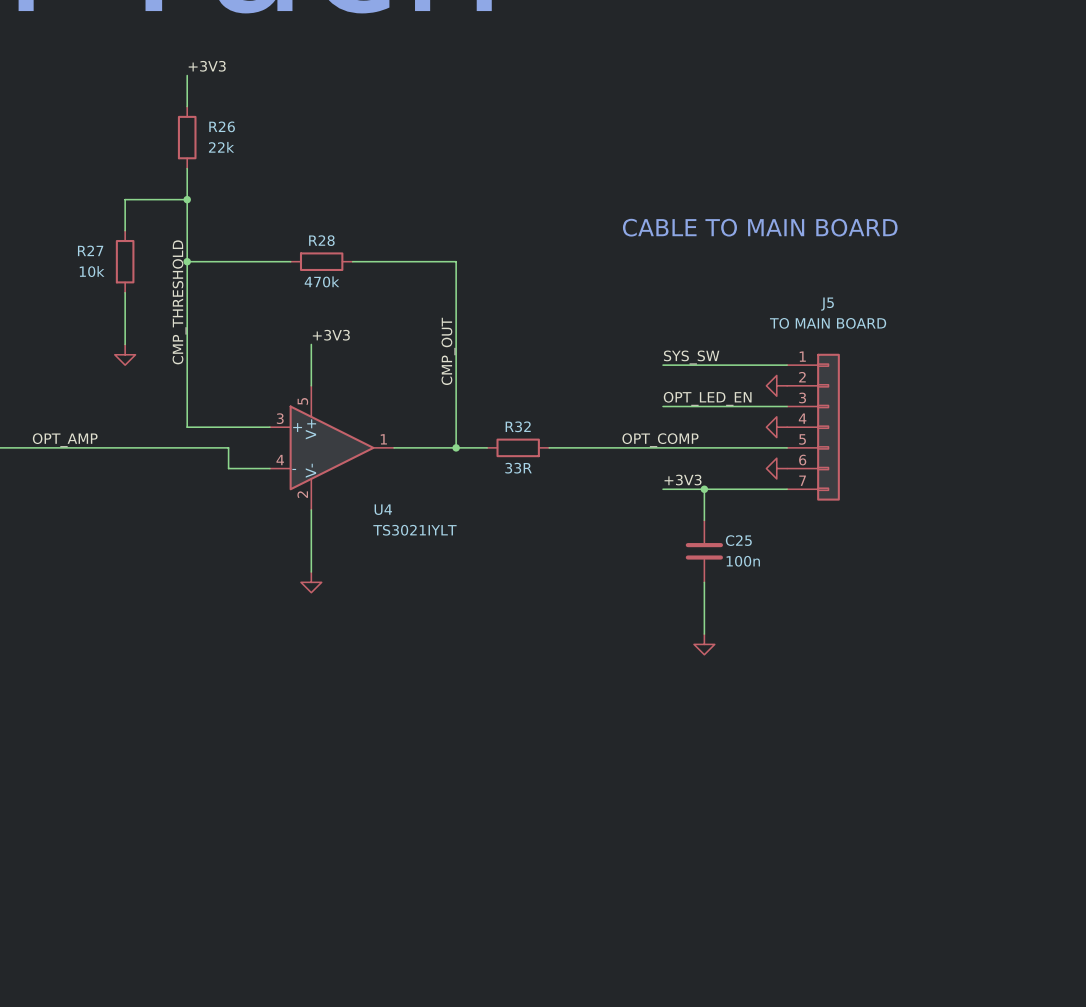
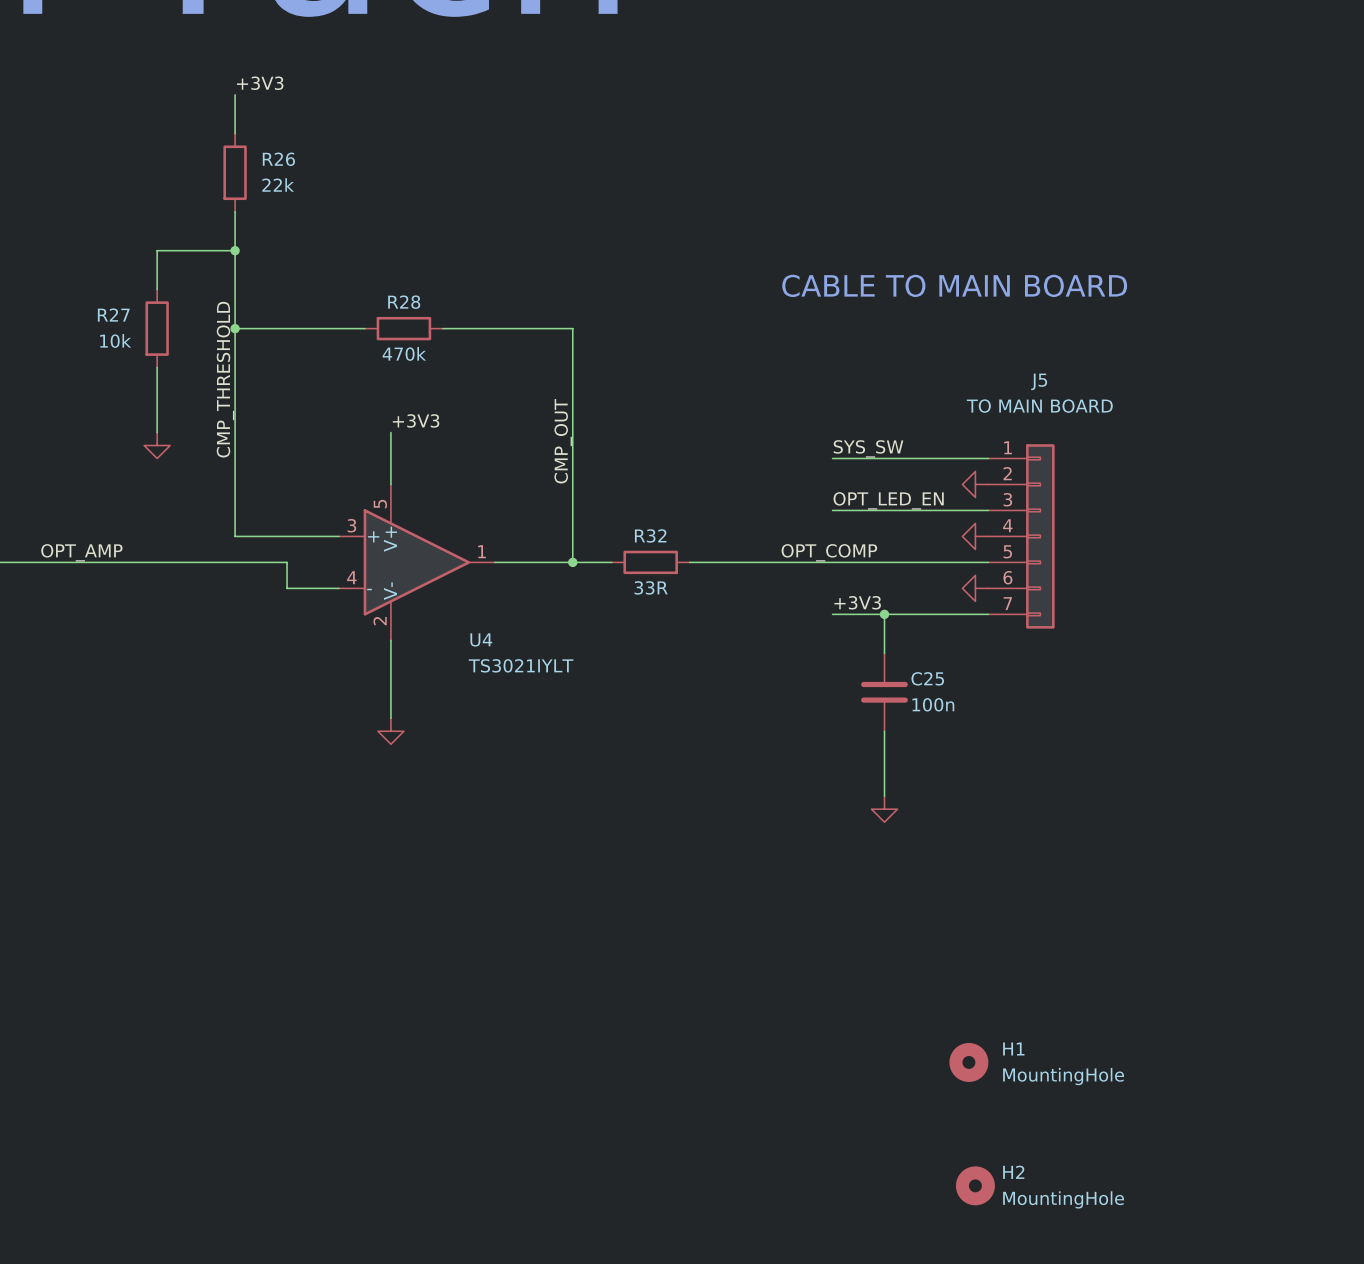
H1: none -> MountingHole (968, 1062)
H2: none -> MountingHole (975, 1185)

